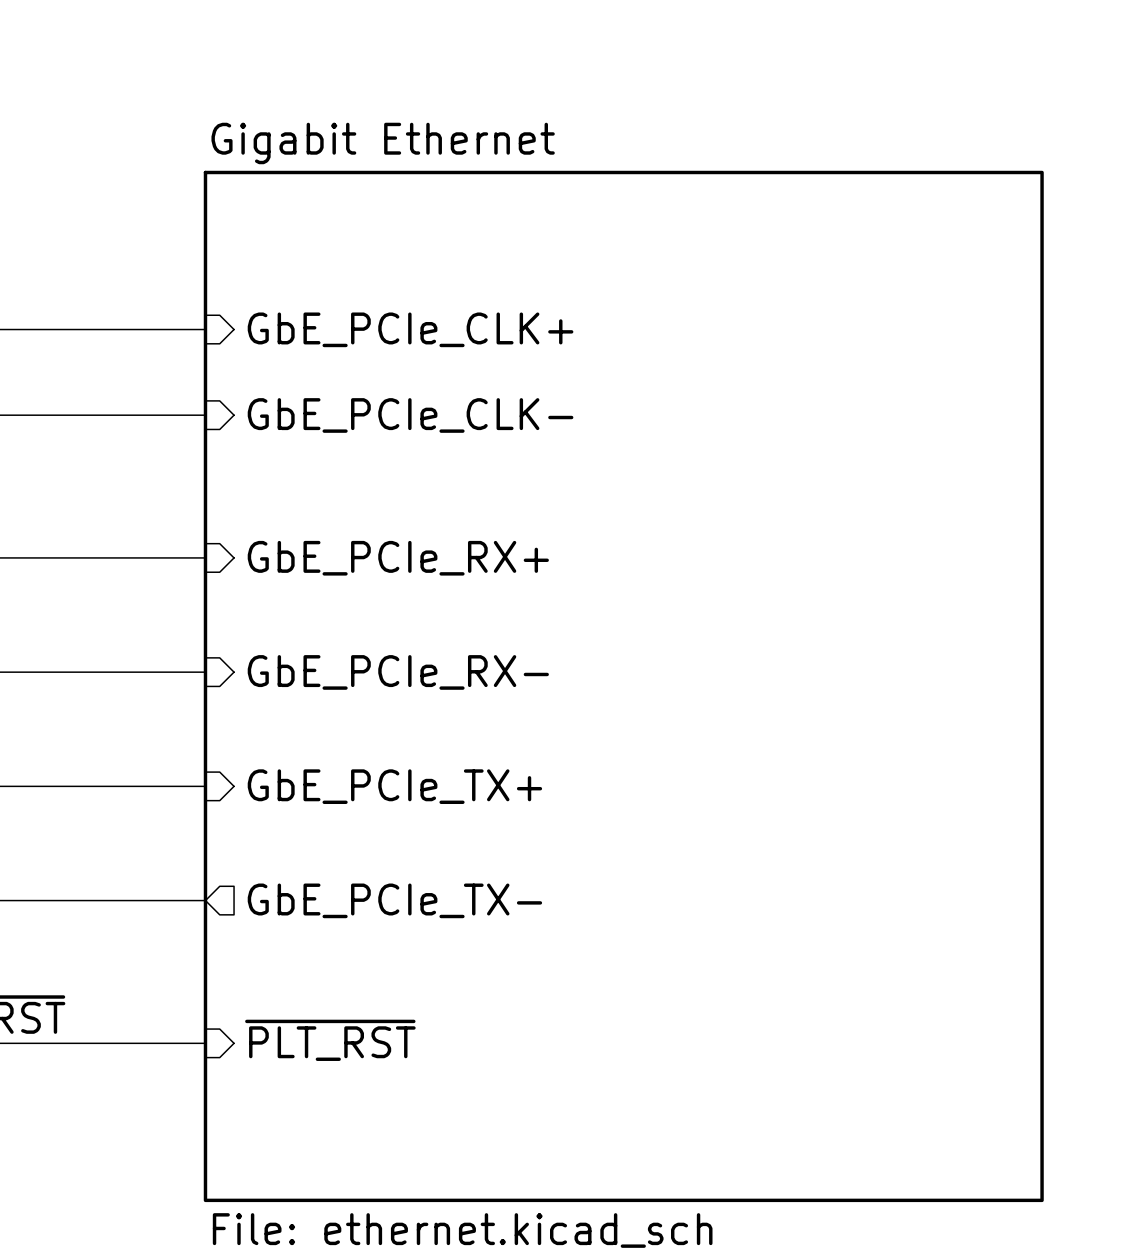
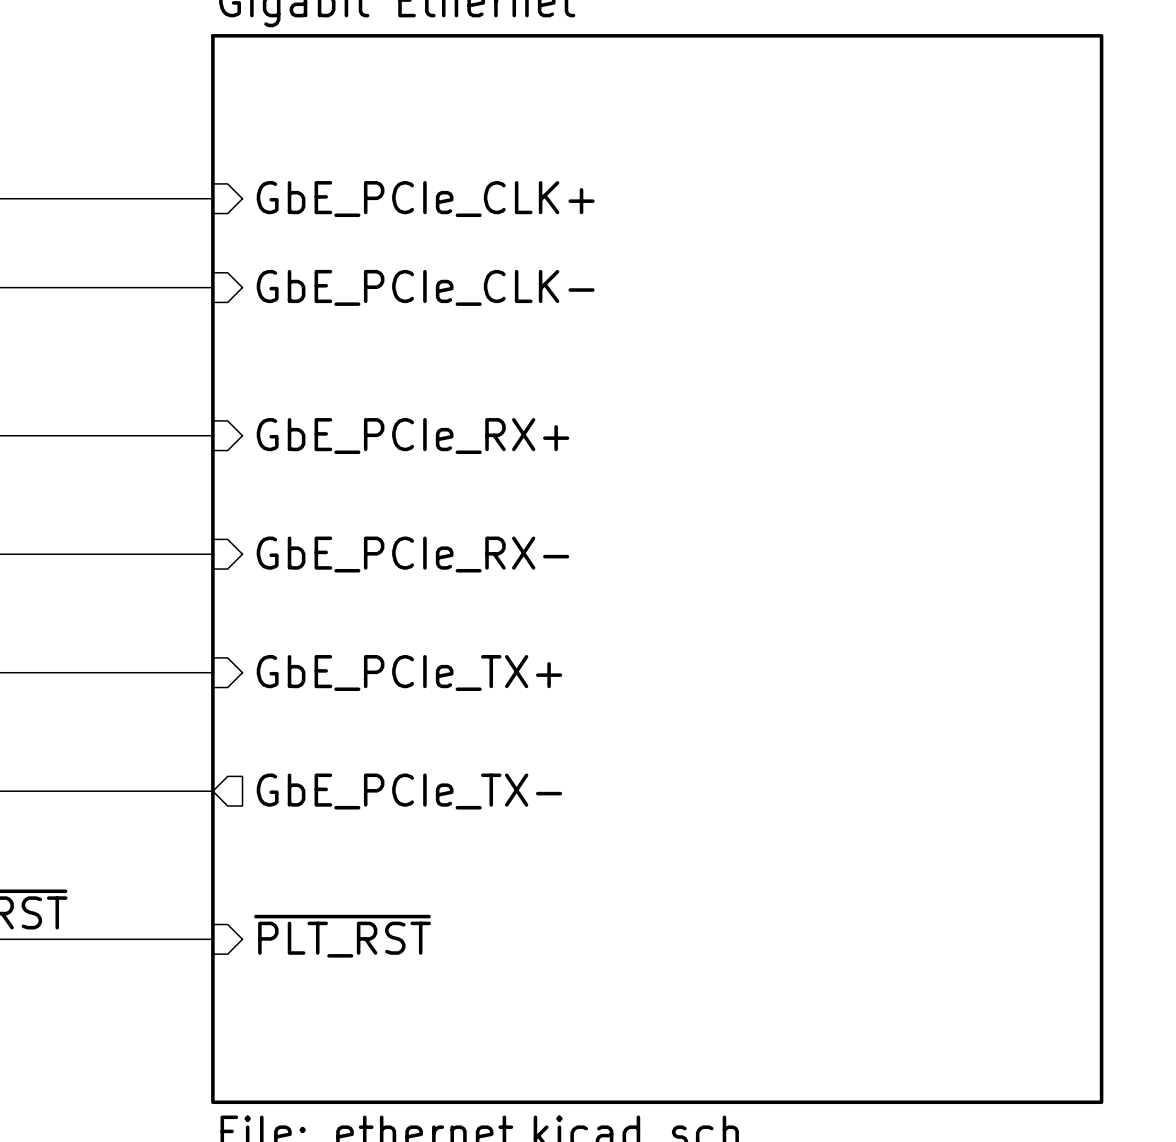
sheet Gigabit Ethernet shape: [203, 170, 1044, 1203] -> [211, 34, 1104, 1105]

